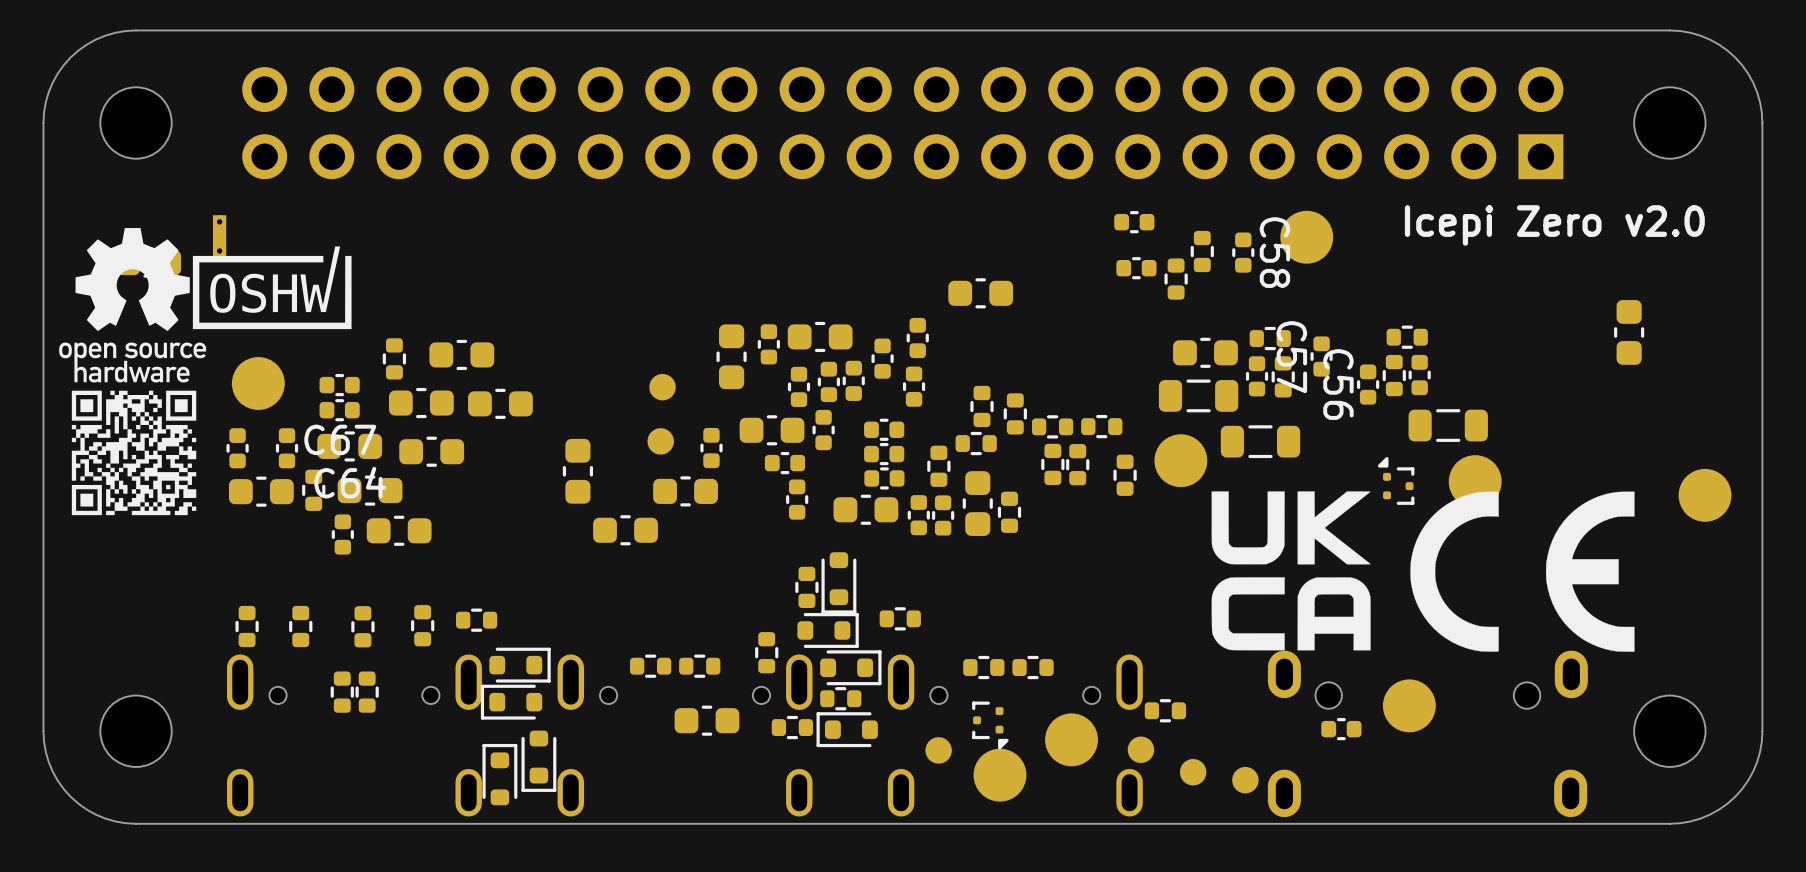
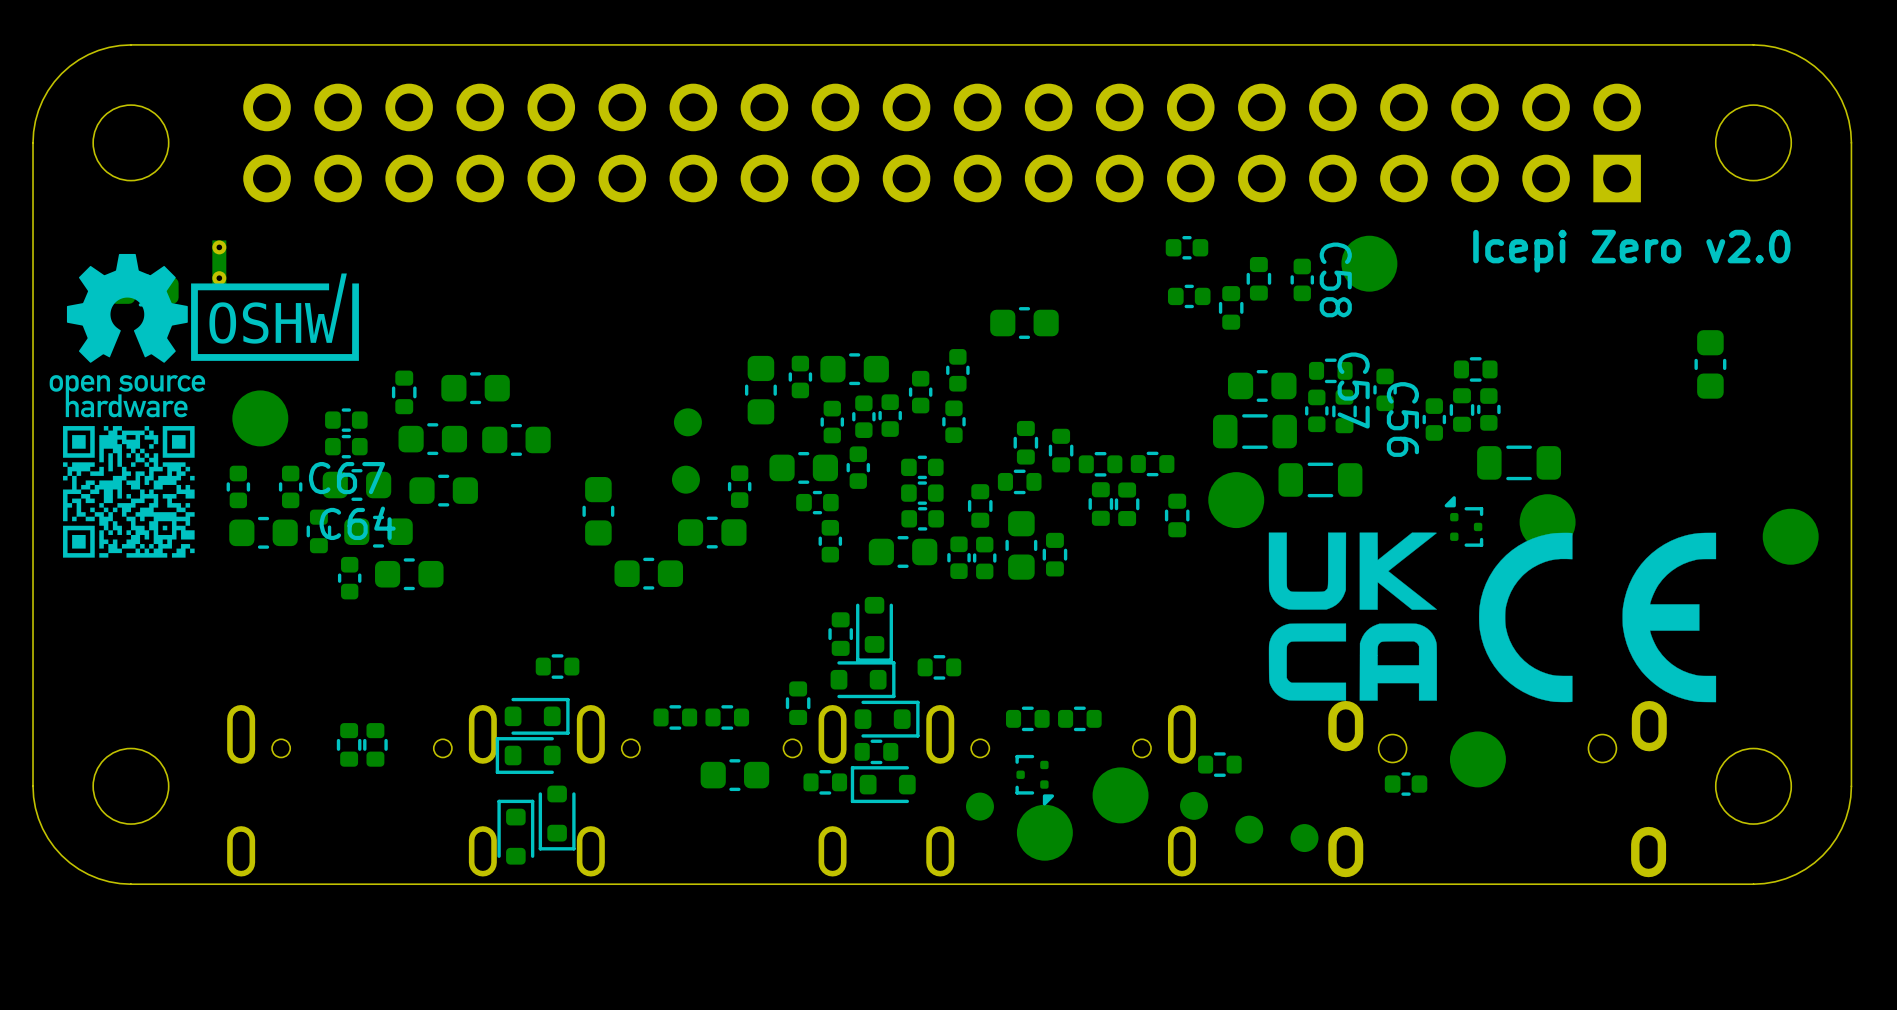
part: none -> (557, 666)
part: (476, 620) -> none
part: (422, 625) -> none
part: (247, 626) -> none
part: (300, 626) -> none
part: (362, 626) -> none

